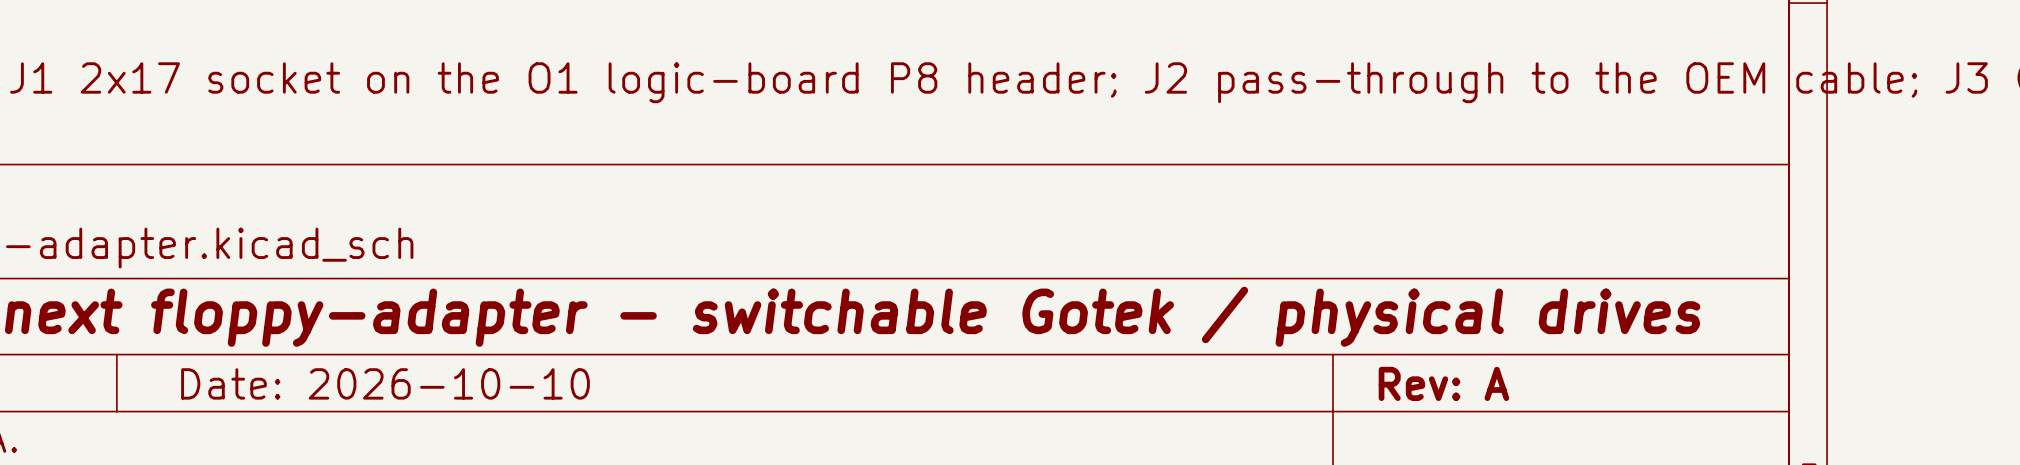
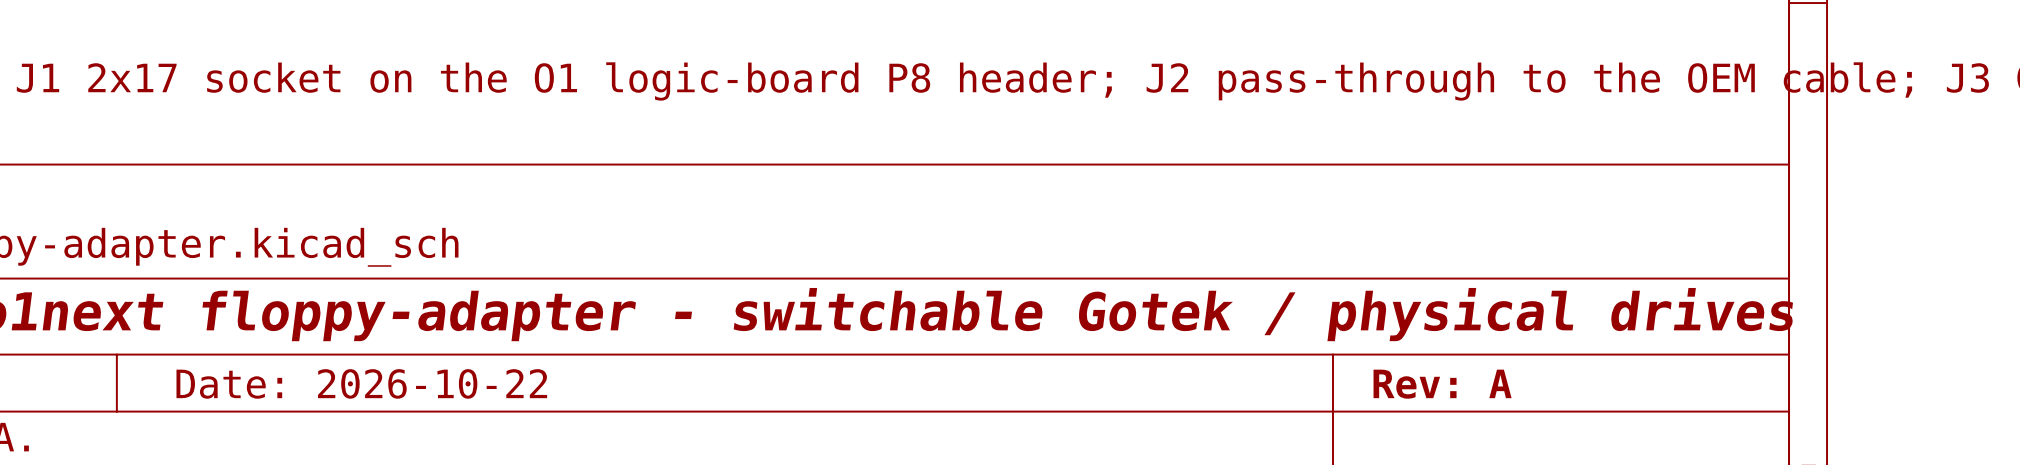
title block: Date: 2026-10-10 (385, 383) -> Date: 2026-10-22 (361, 383)

